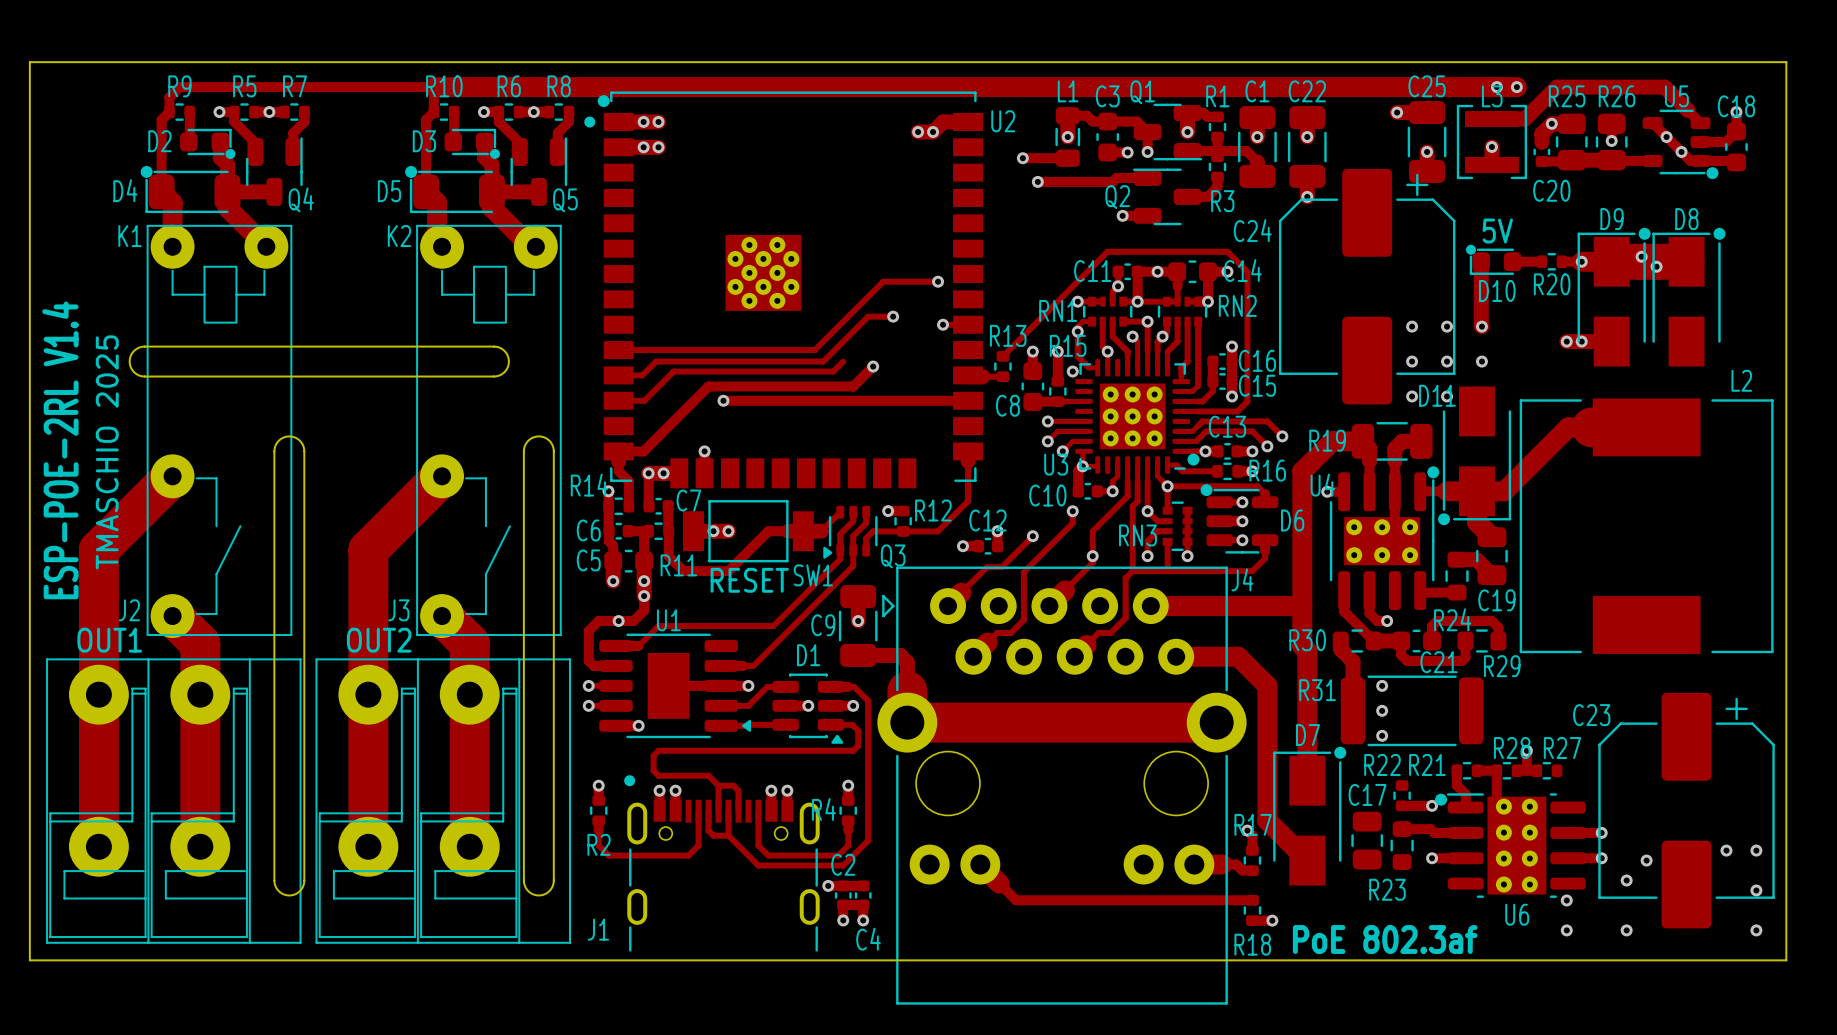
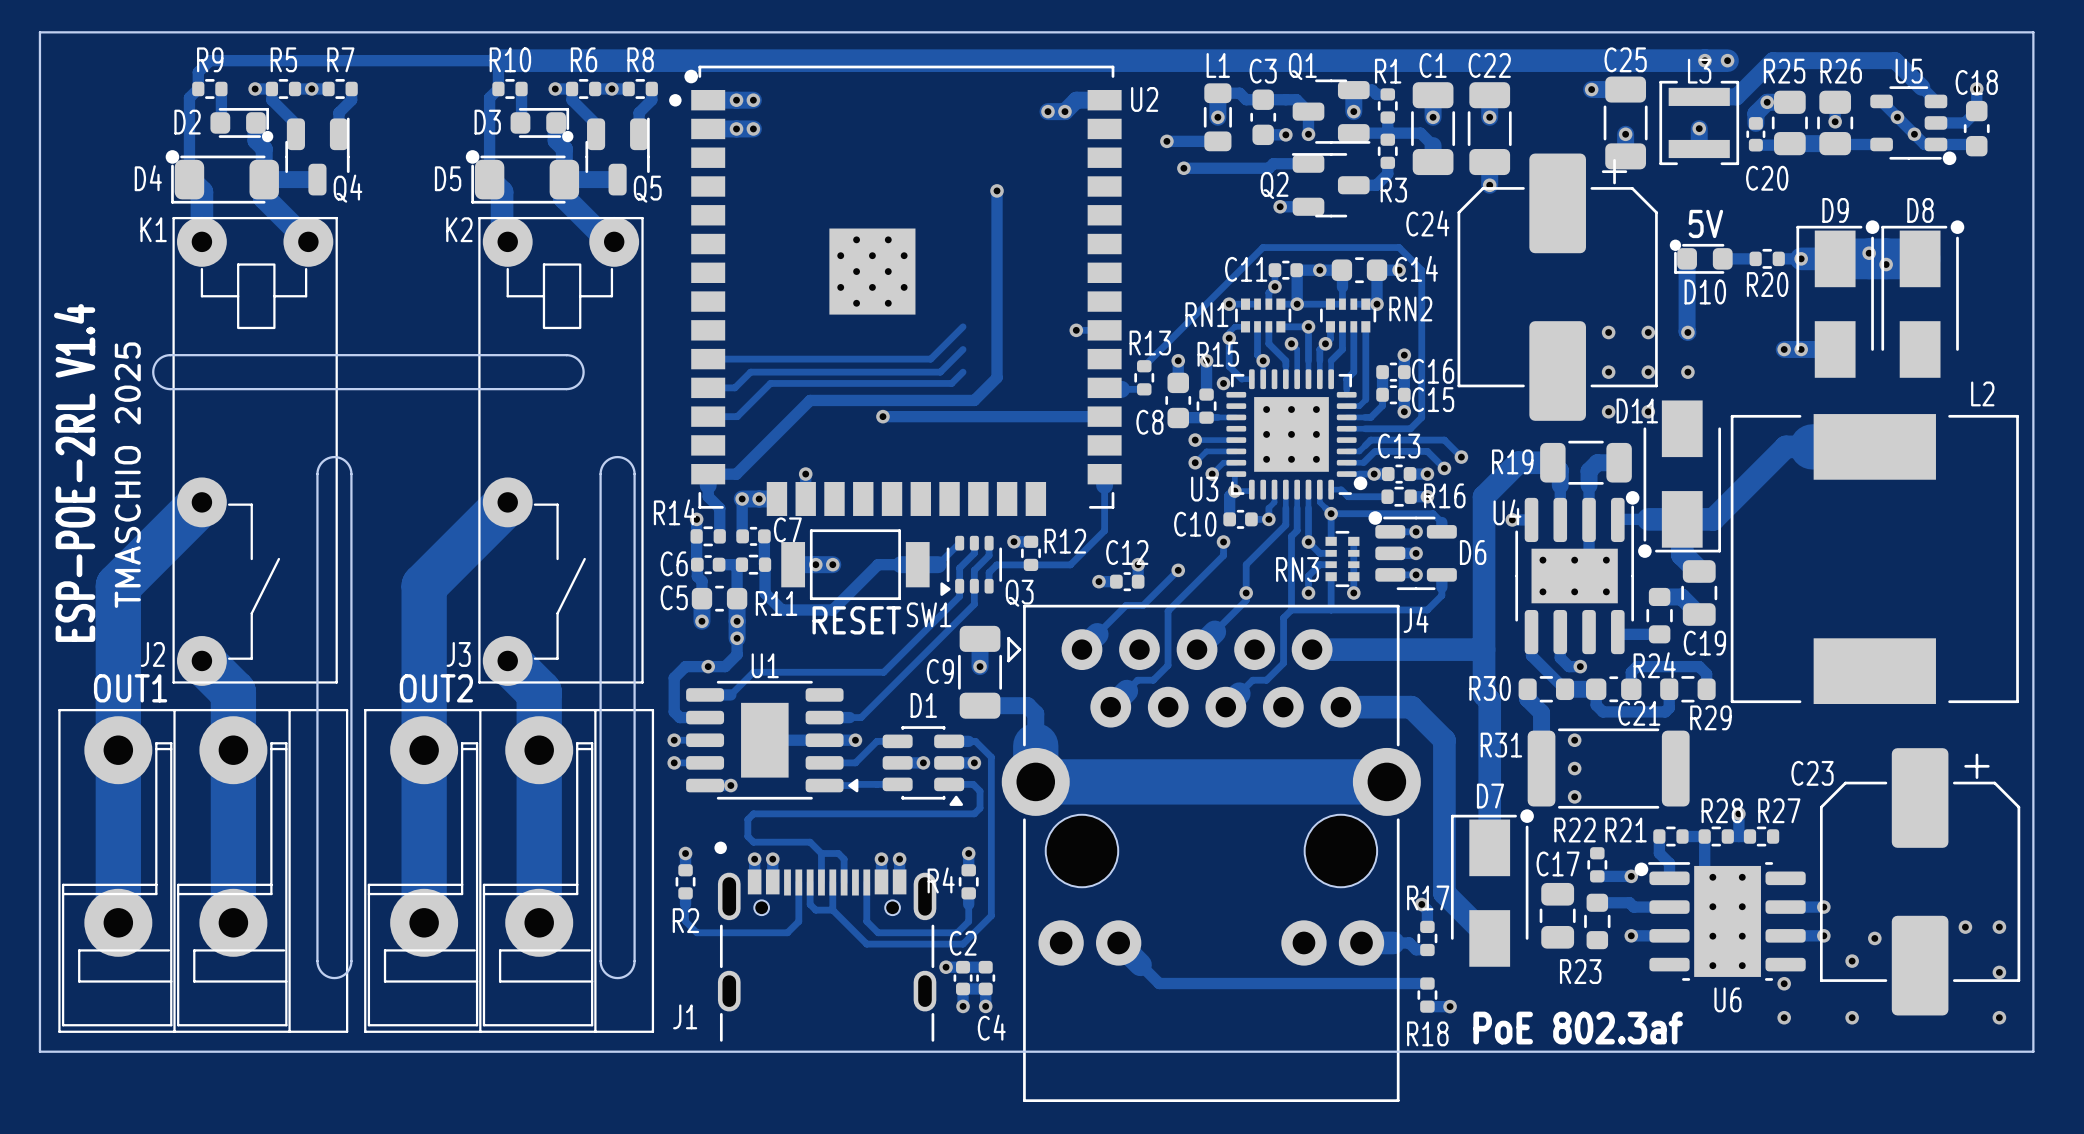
track: none -> (997, 190) (997, 377)
via: none -> (997, 190)
track: (938, 281) (883, 281) (843, 321) -> none
via: (938, 281) -> none
track: (893, 316) (868, 316) (843, 341) -> none
via: (893, 316) -> none
via: (873, 366) -> none
track: (723, 400) (772, 400) -> none
via position: (723, 400) -> (882, 416)

